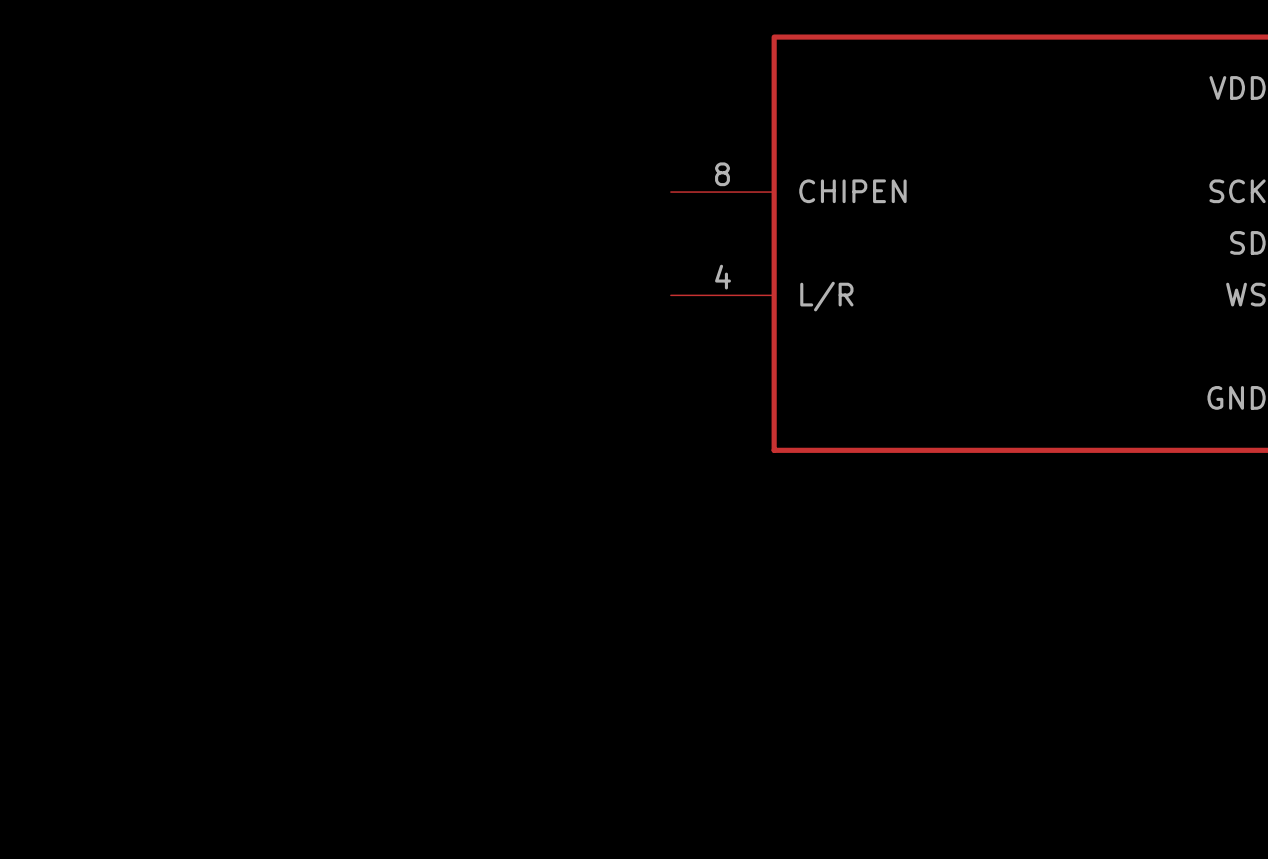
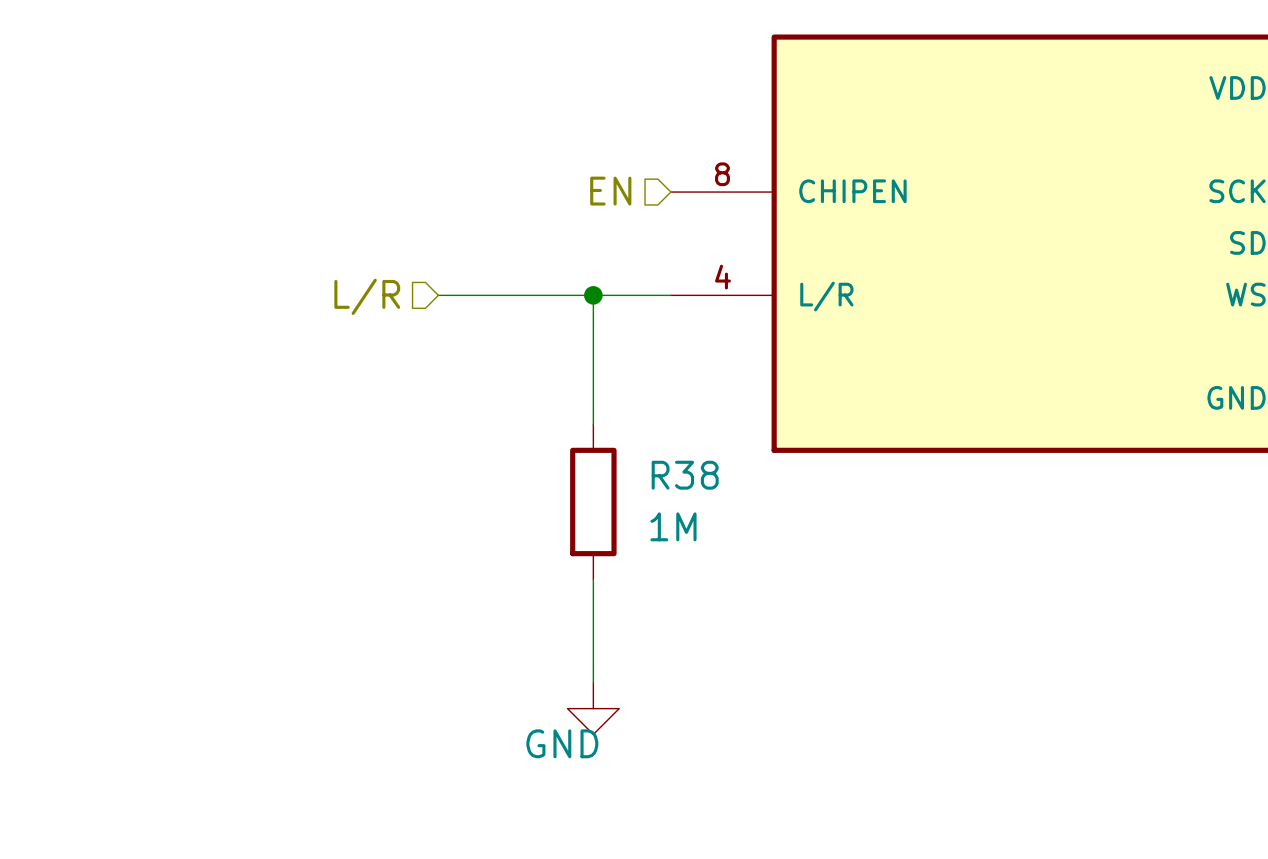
hierarchical label: none -> EN (610, 191)
wire: none -> (438, 295) (670, 295)
wire: none -> (593, 295) (593, 424)
junction: none -> (593, 295)
hierarchical label: none -> L/R (367, 296)
R38: none -> 1M (593, 501)
wire: none -> (593, 579) (593, 682)
power symbol: none -> GND (593, 708)

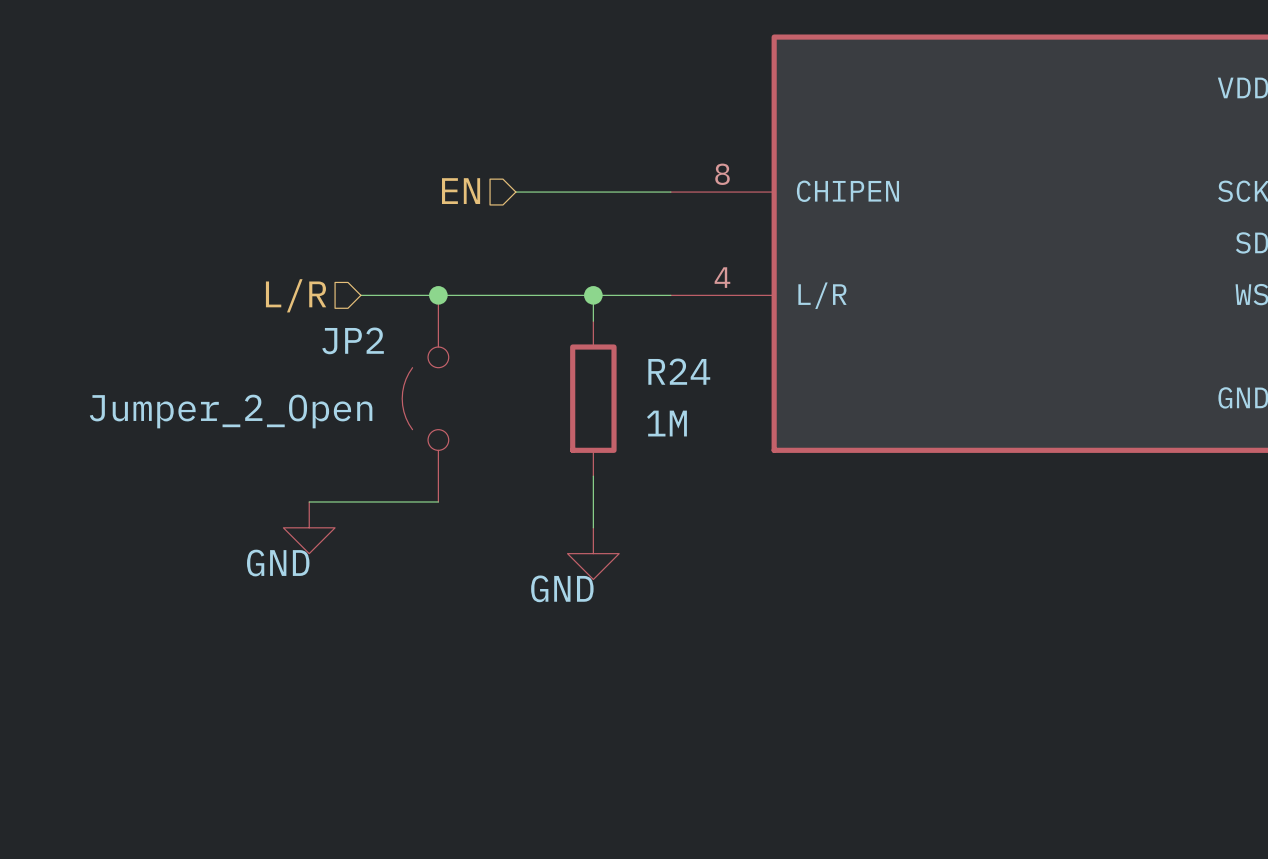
hierarchical label position: EN (610, 191) -> EN (461, 191)
wire: none -> (515, 192) (670, 192)
wire: none -> (360, 295) (438, 295)
junction: none -> (438, 295)
hierarchical label position: L/R (367, 296) -> L/R (296, 295)
wire: (593, 321) (593, 424) -> none
JP2: none -> Jumper_2_Open (425, 398)
R24: none -> 1M (593, 398)
wire: none -> (593, 476) (593, 527)
wire: none -> (309, 501) (438, 501)
R38: 1M (593, 501) -> none
power symbol: none -> GND (309, 527)
wire: (593, 579) (593, 682) -> none
power symbol position: GND (593, 708) -> GND (593, 553)

